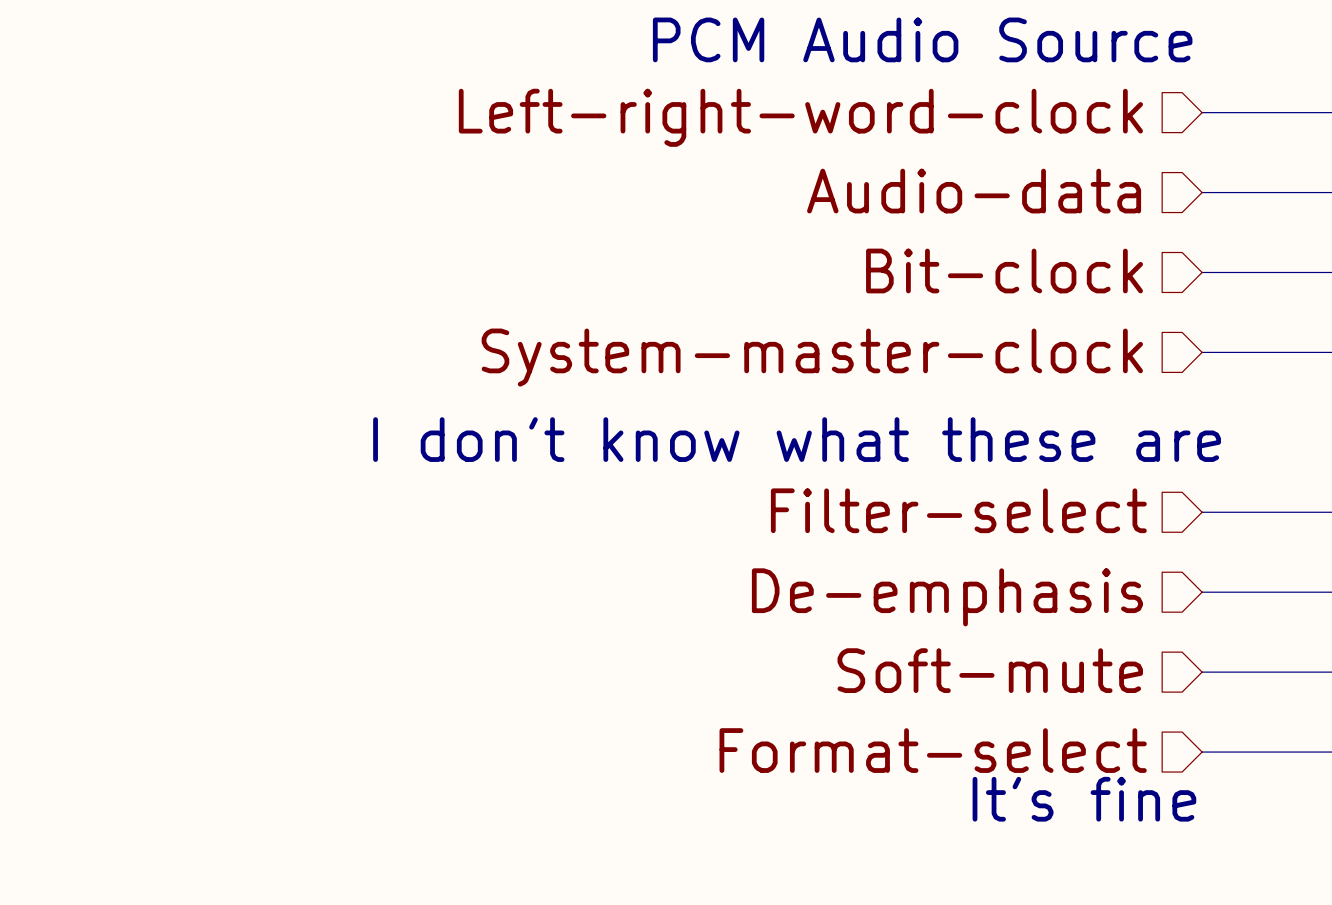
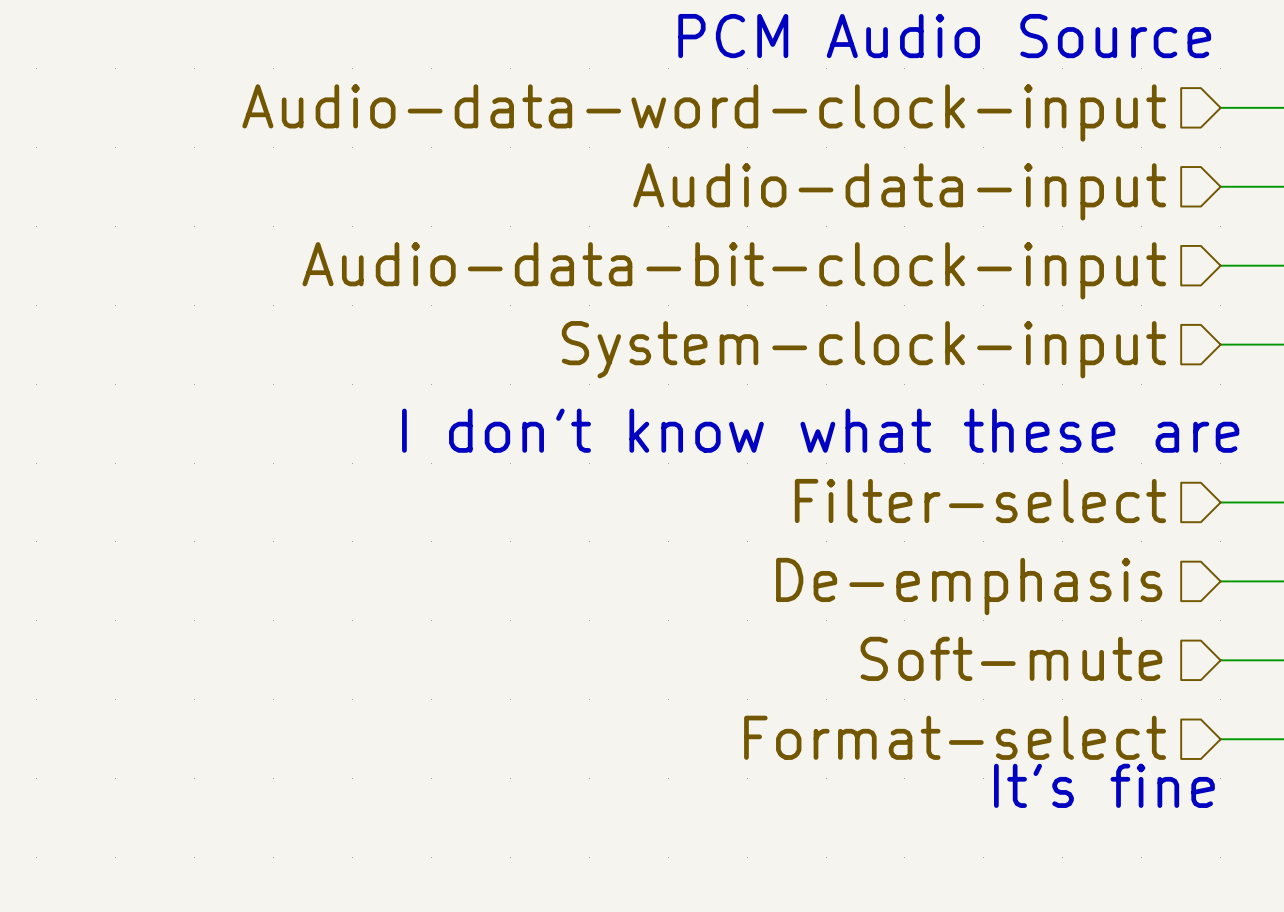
hierarchical label: Left-right-word-clock (800, 117) -> Audio-data-word-clock-input (704, 112)
hierarchical label: Audio-data (974, 191) -> Audio-data-input (899, 191)
hierarchical label: Bit-clock (1004, 270) -> Audio-data-bit-clock-input (734, 270)
hierarchical label: System-master-clock (812, 357) -> System-clock-input (863, 349)

